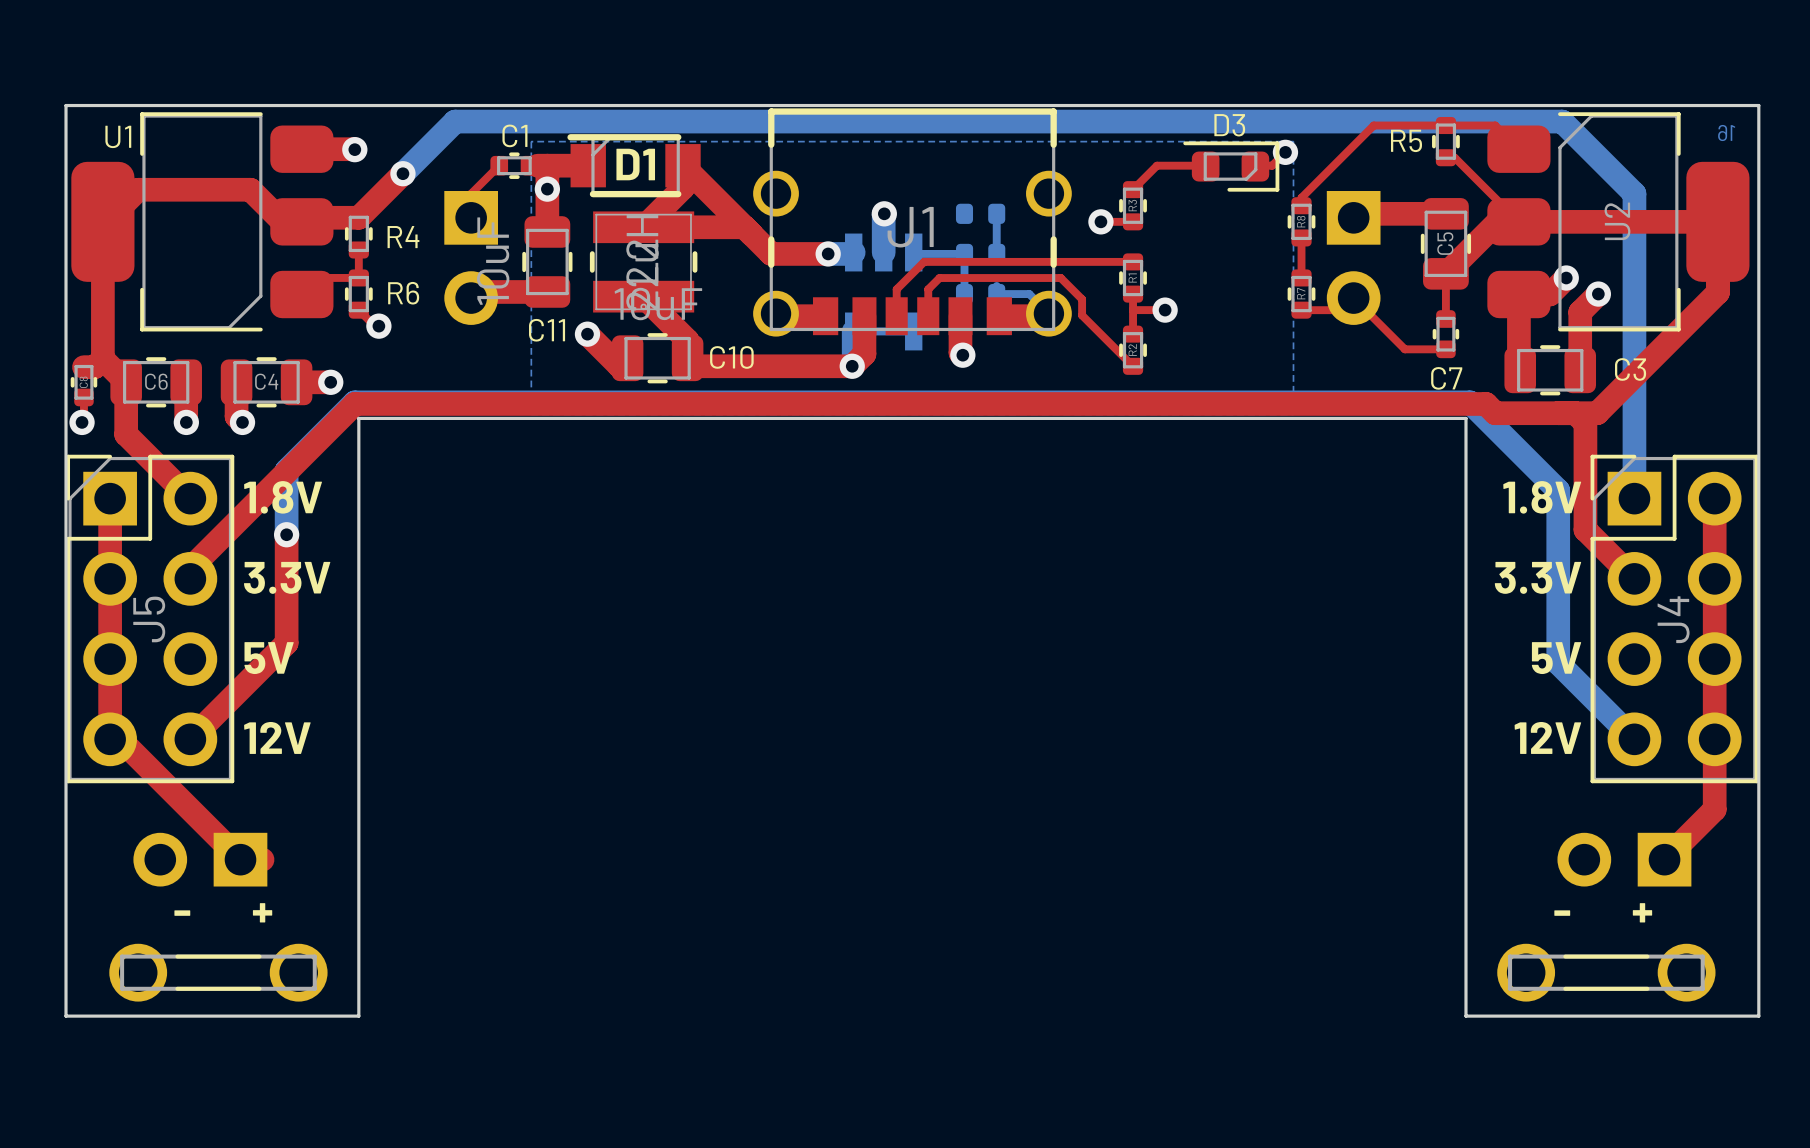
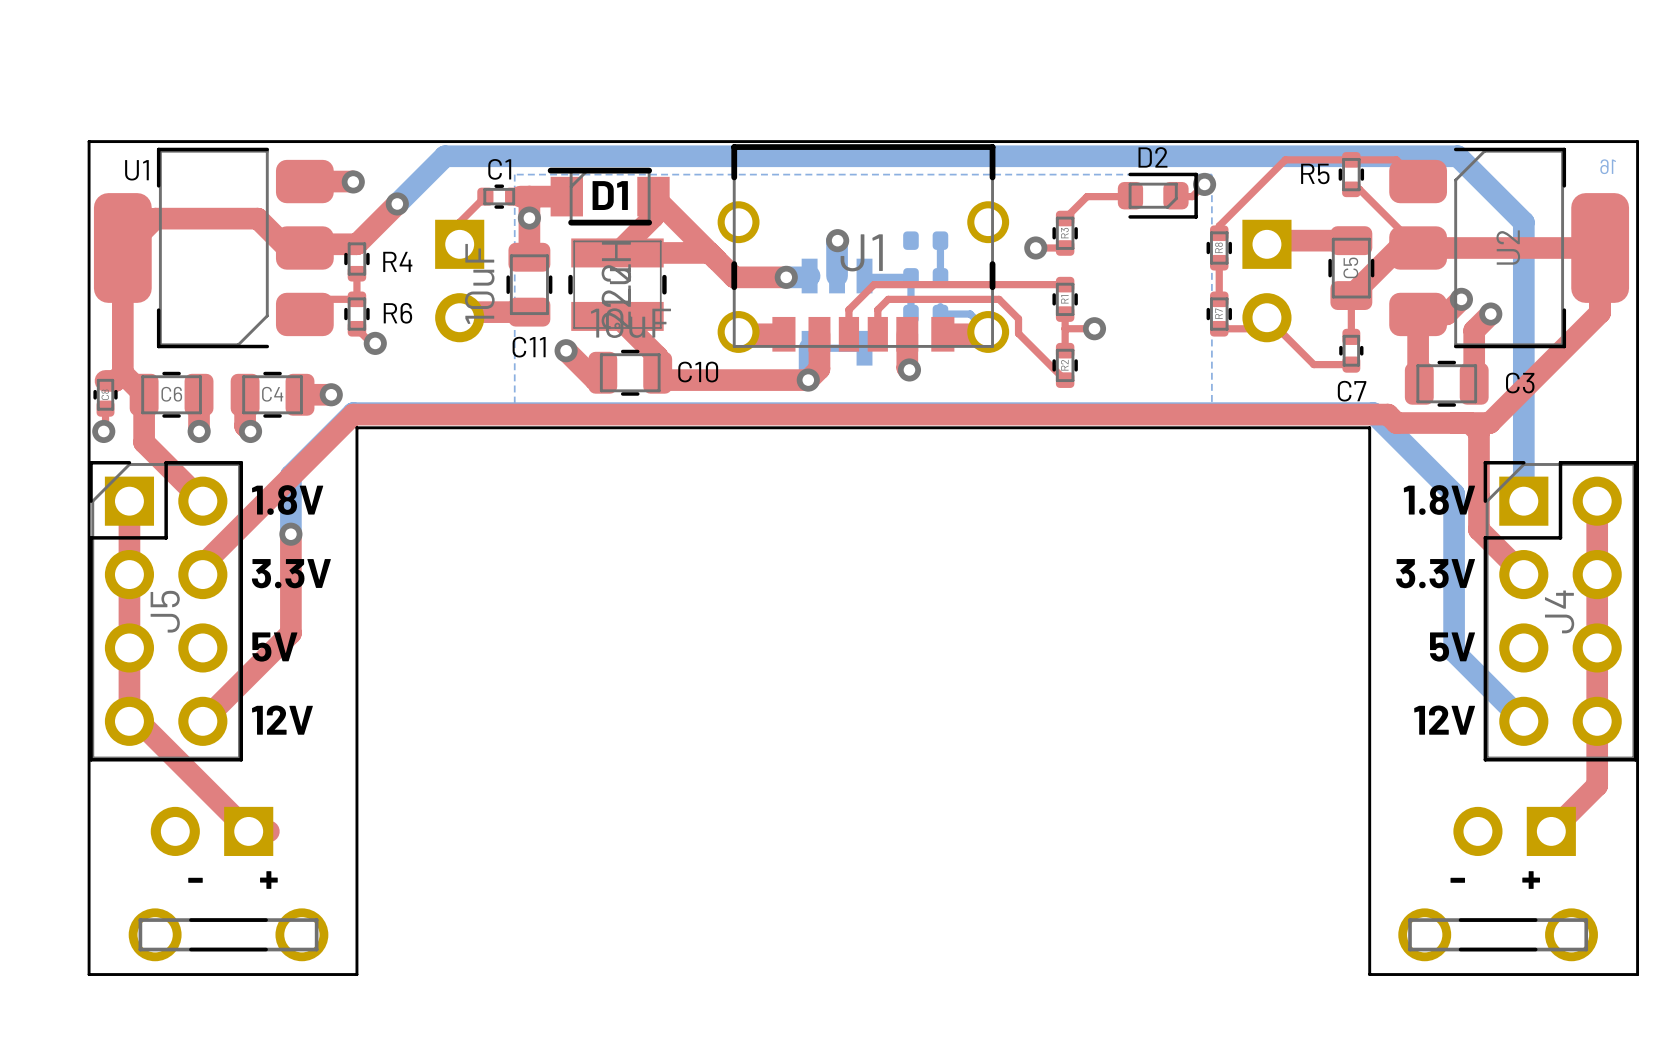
D2: none -> (1157, 195)
D3: (1231, 166) -> none

